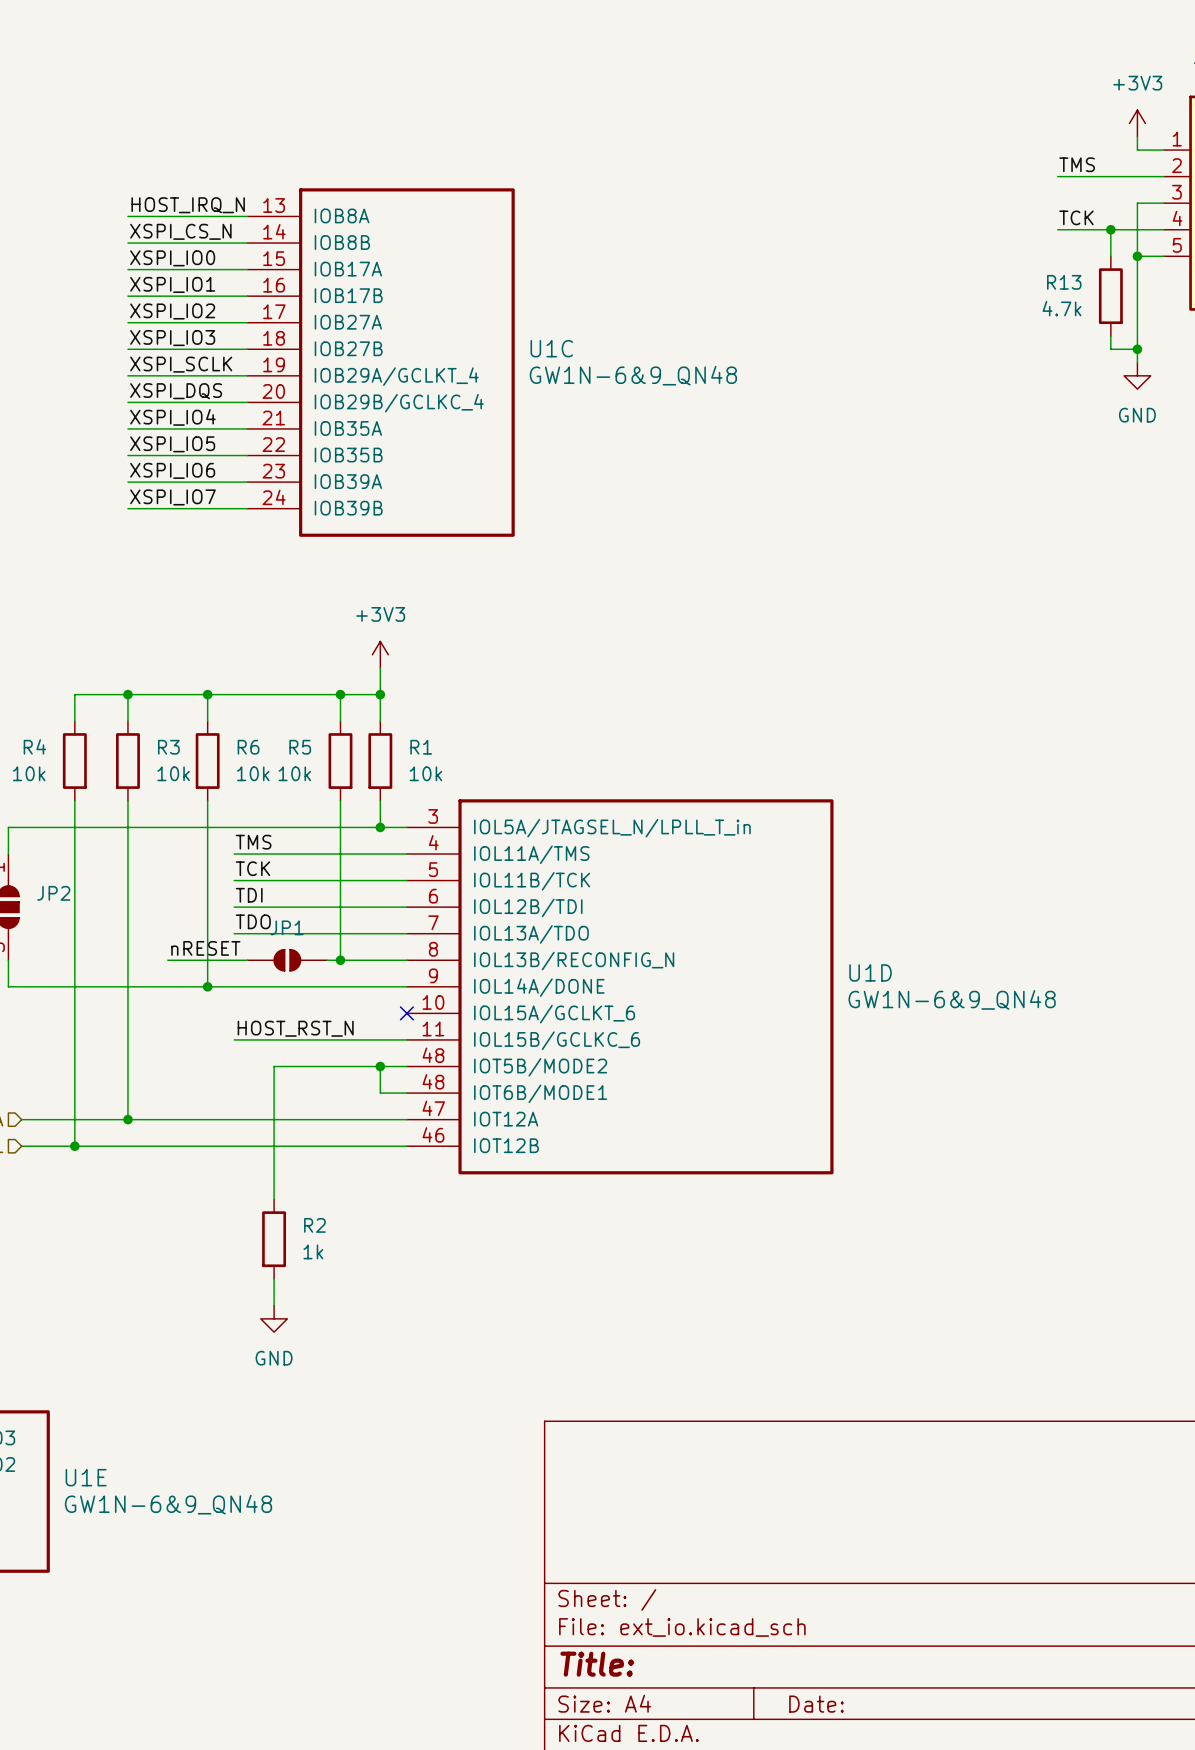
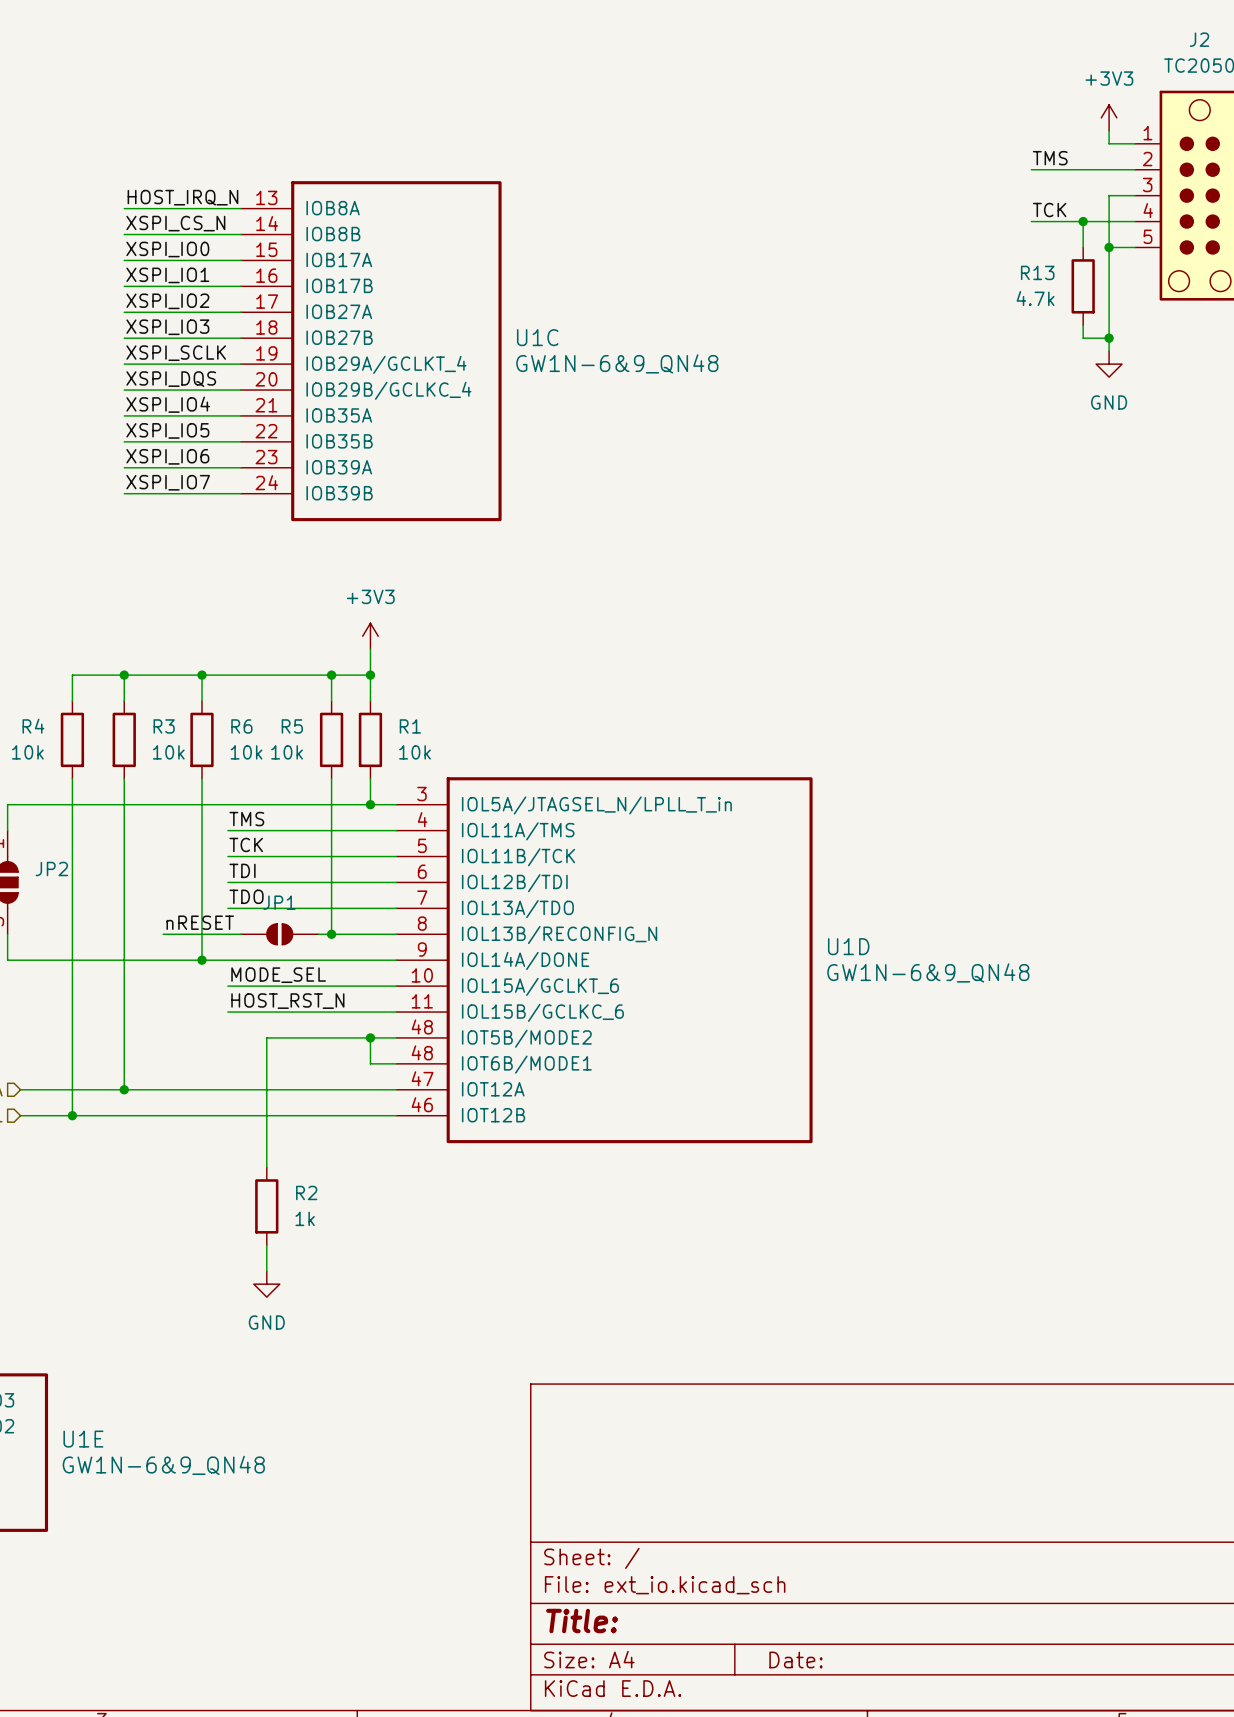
label: none -> MODE_SEL (278, 975)
wire: none -> (227, 986) (396, 986)
no-connect mark: (406, 1013) -> none

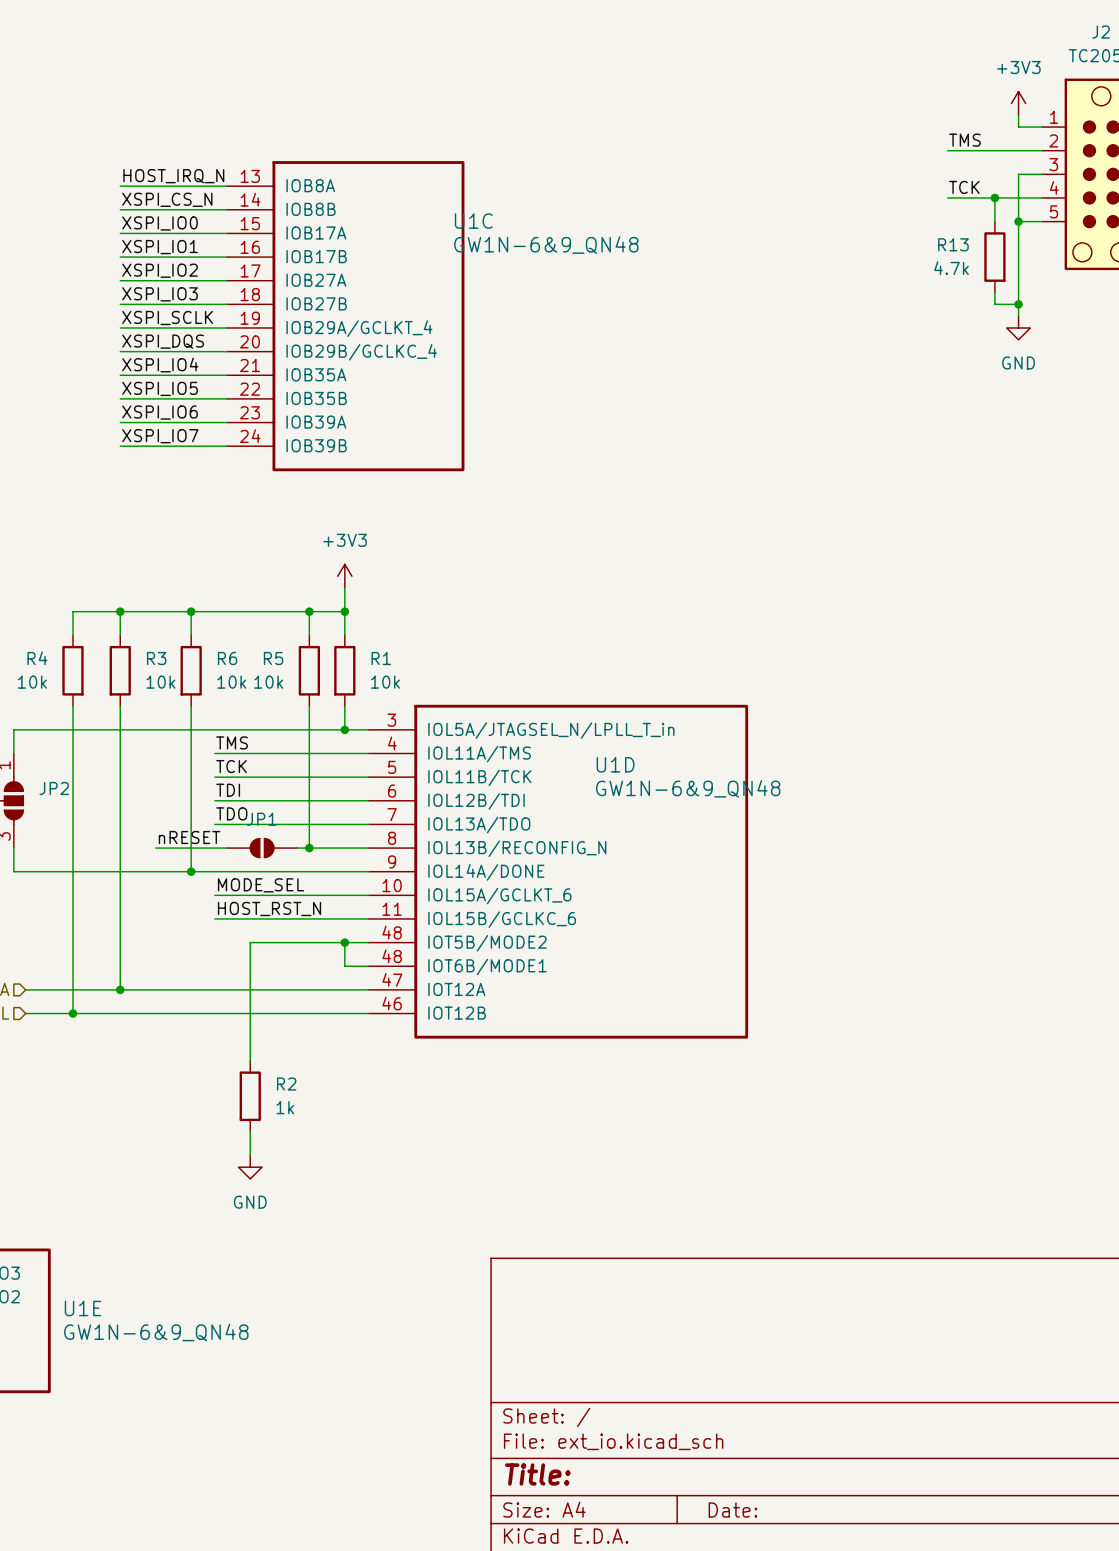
U1C name position: U1C (537, 337) -> U1C (473, 221)
U1C value position: GW1N-6&9_QN48 (617, 363) -> GW1N-6&9_QN48 (546, 245)
U1D name position: U1D (848, 946) -> U1D (615, 764)
U1D value position: GW1N-6&9_QN48 (928, 972) -> GW1N-6&9_QN48 (688, 788)

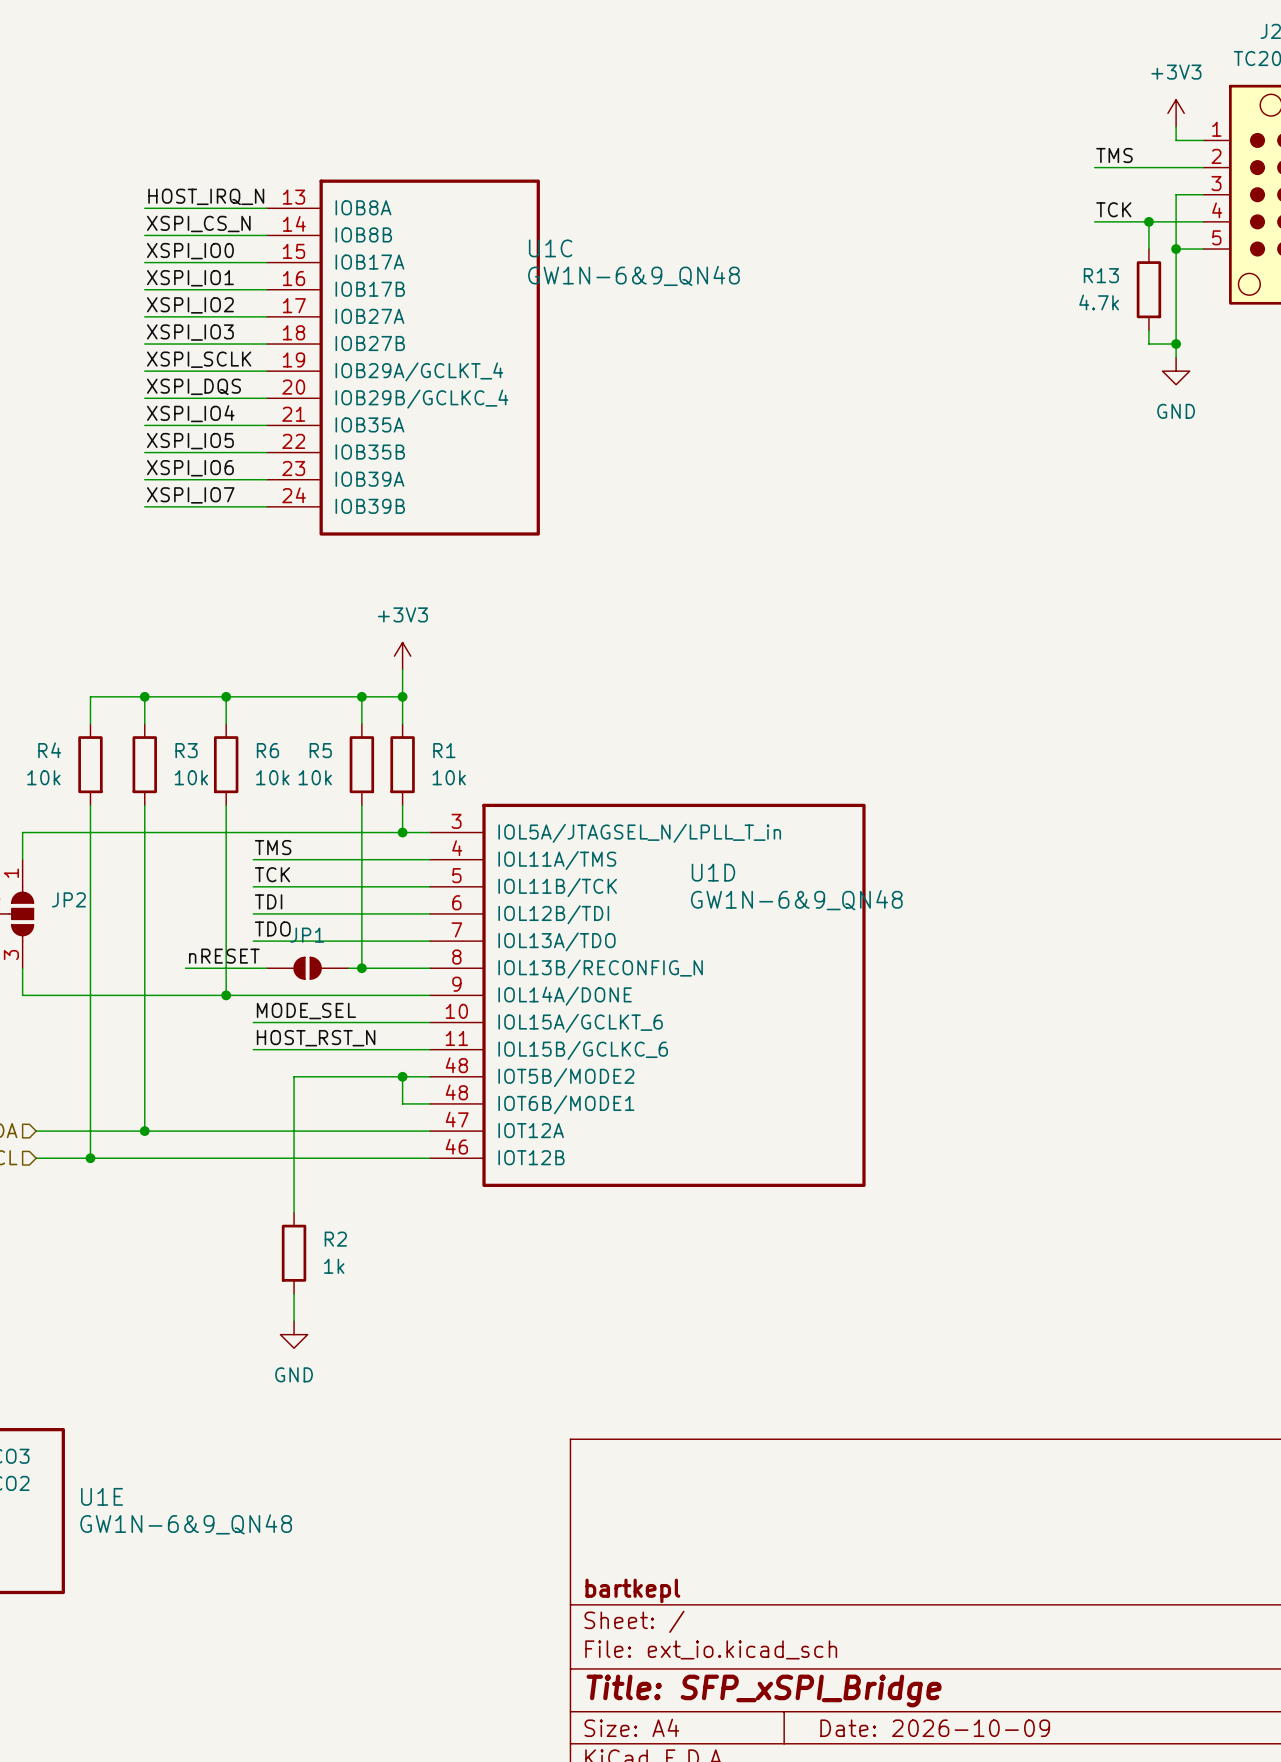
title block: none -> bartkepl (632, 1590)
title block: Title: (537, 1474) -> Title: SFP_xSPI_Bridge (764, 1690)
title block: Date: (732, 1510) -> Date: 2026-10-09 (935, 1728)

